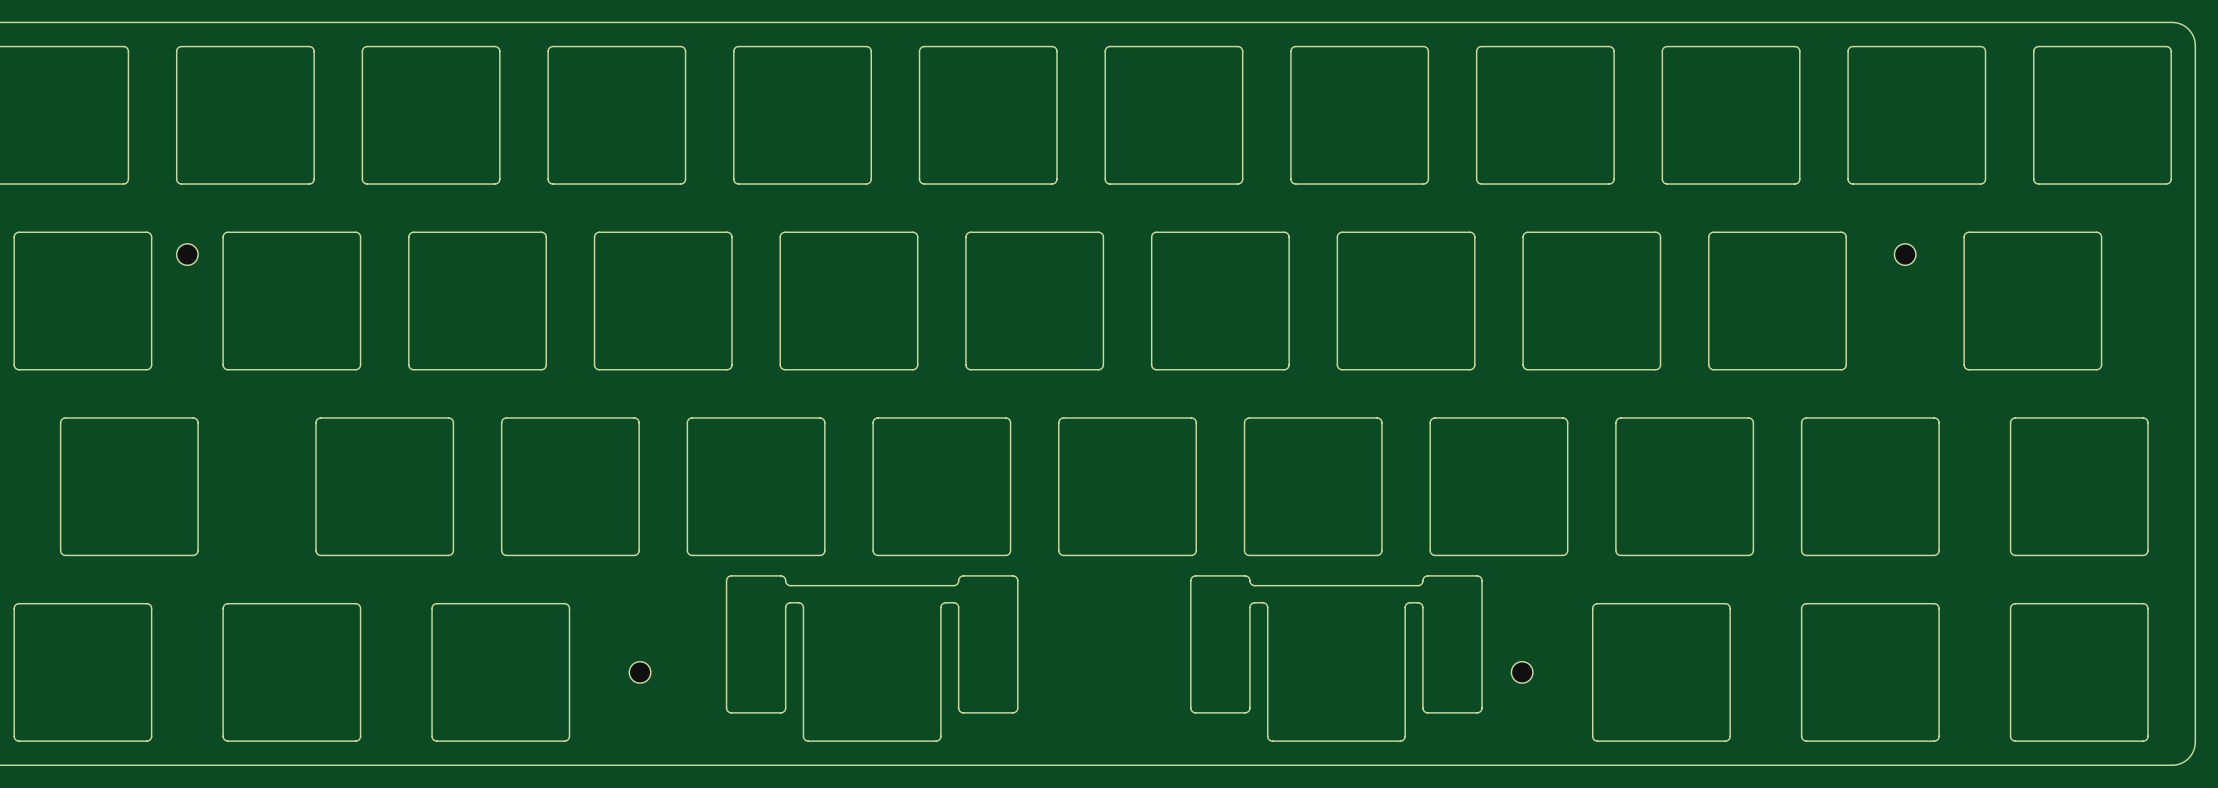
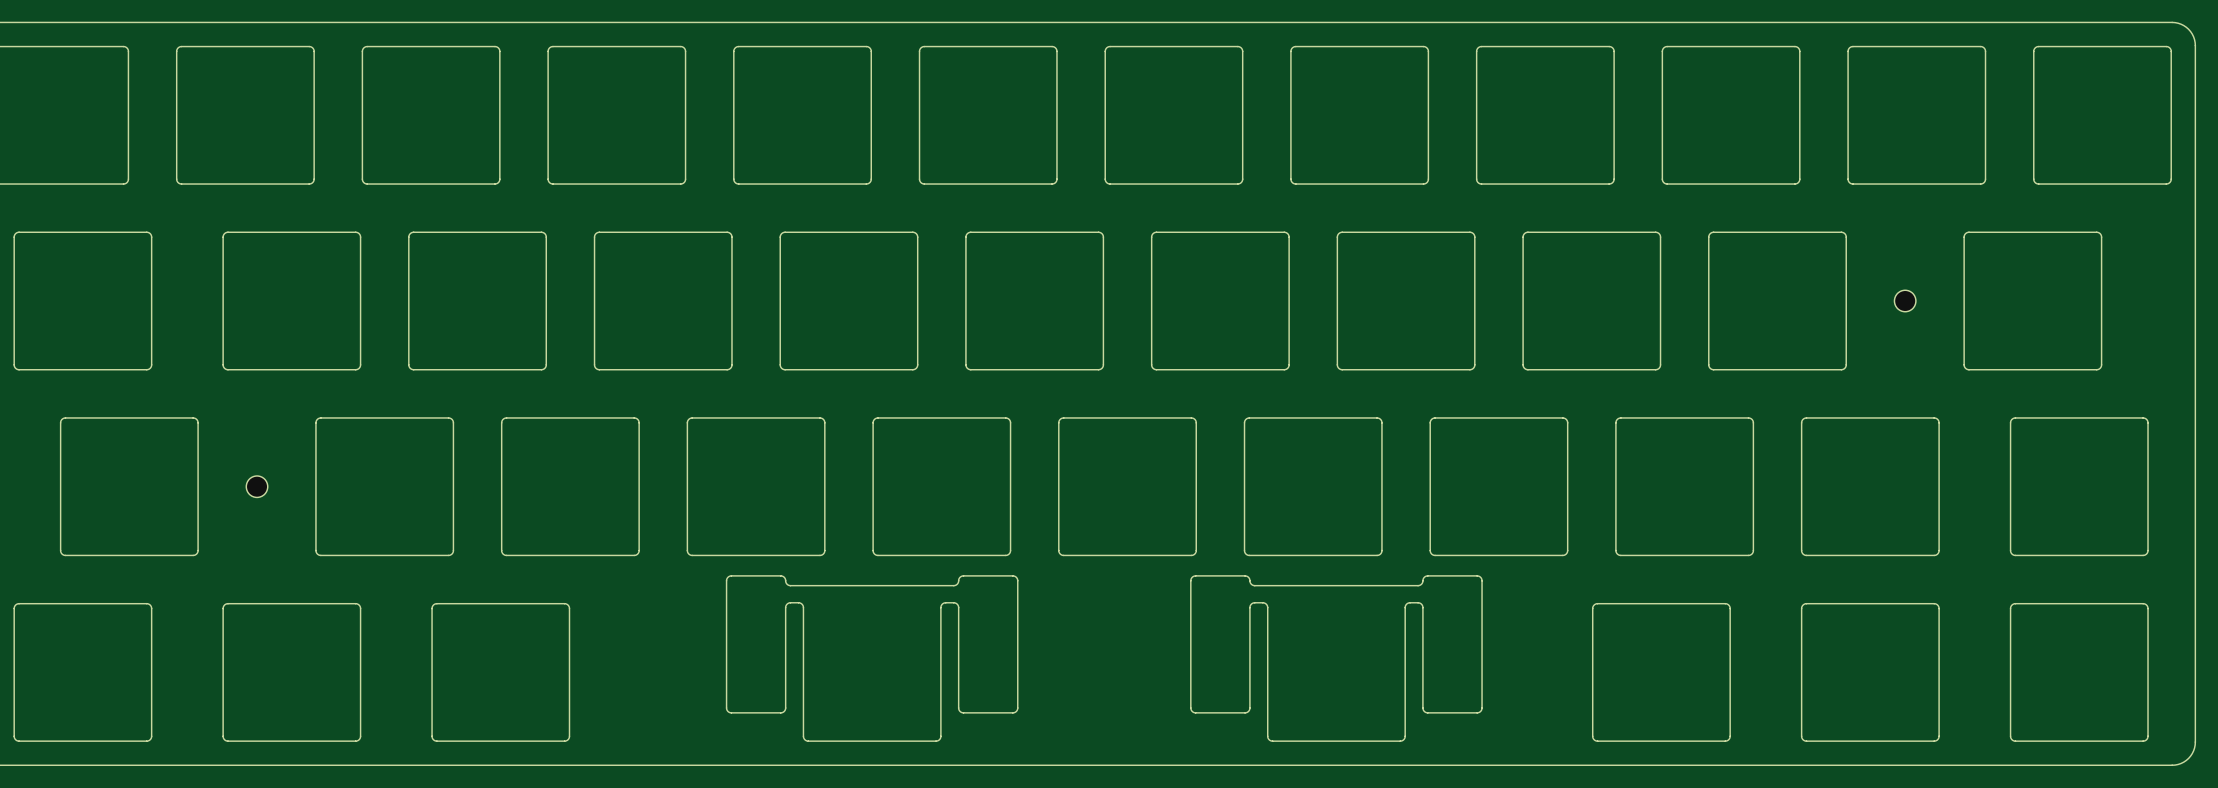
part: (187, 254) -> none
part position: (1905, 254) -> (1905, 301)
part: none -> (257, 486)
part: (640, 672) -> none
part: (1522, 672) -> none

